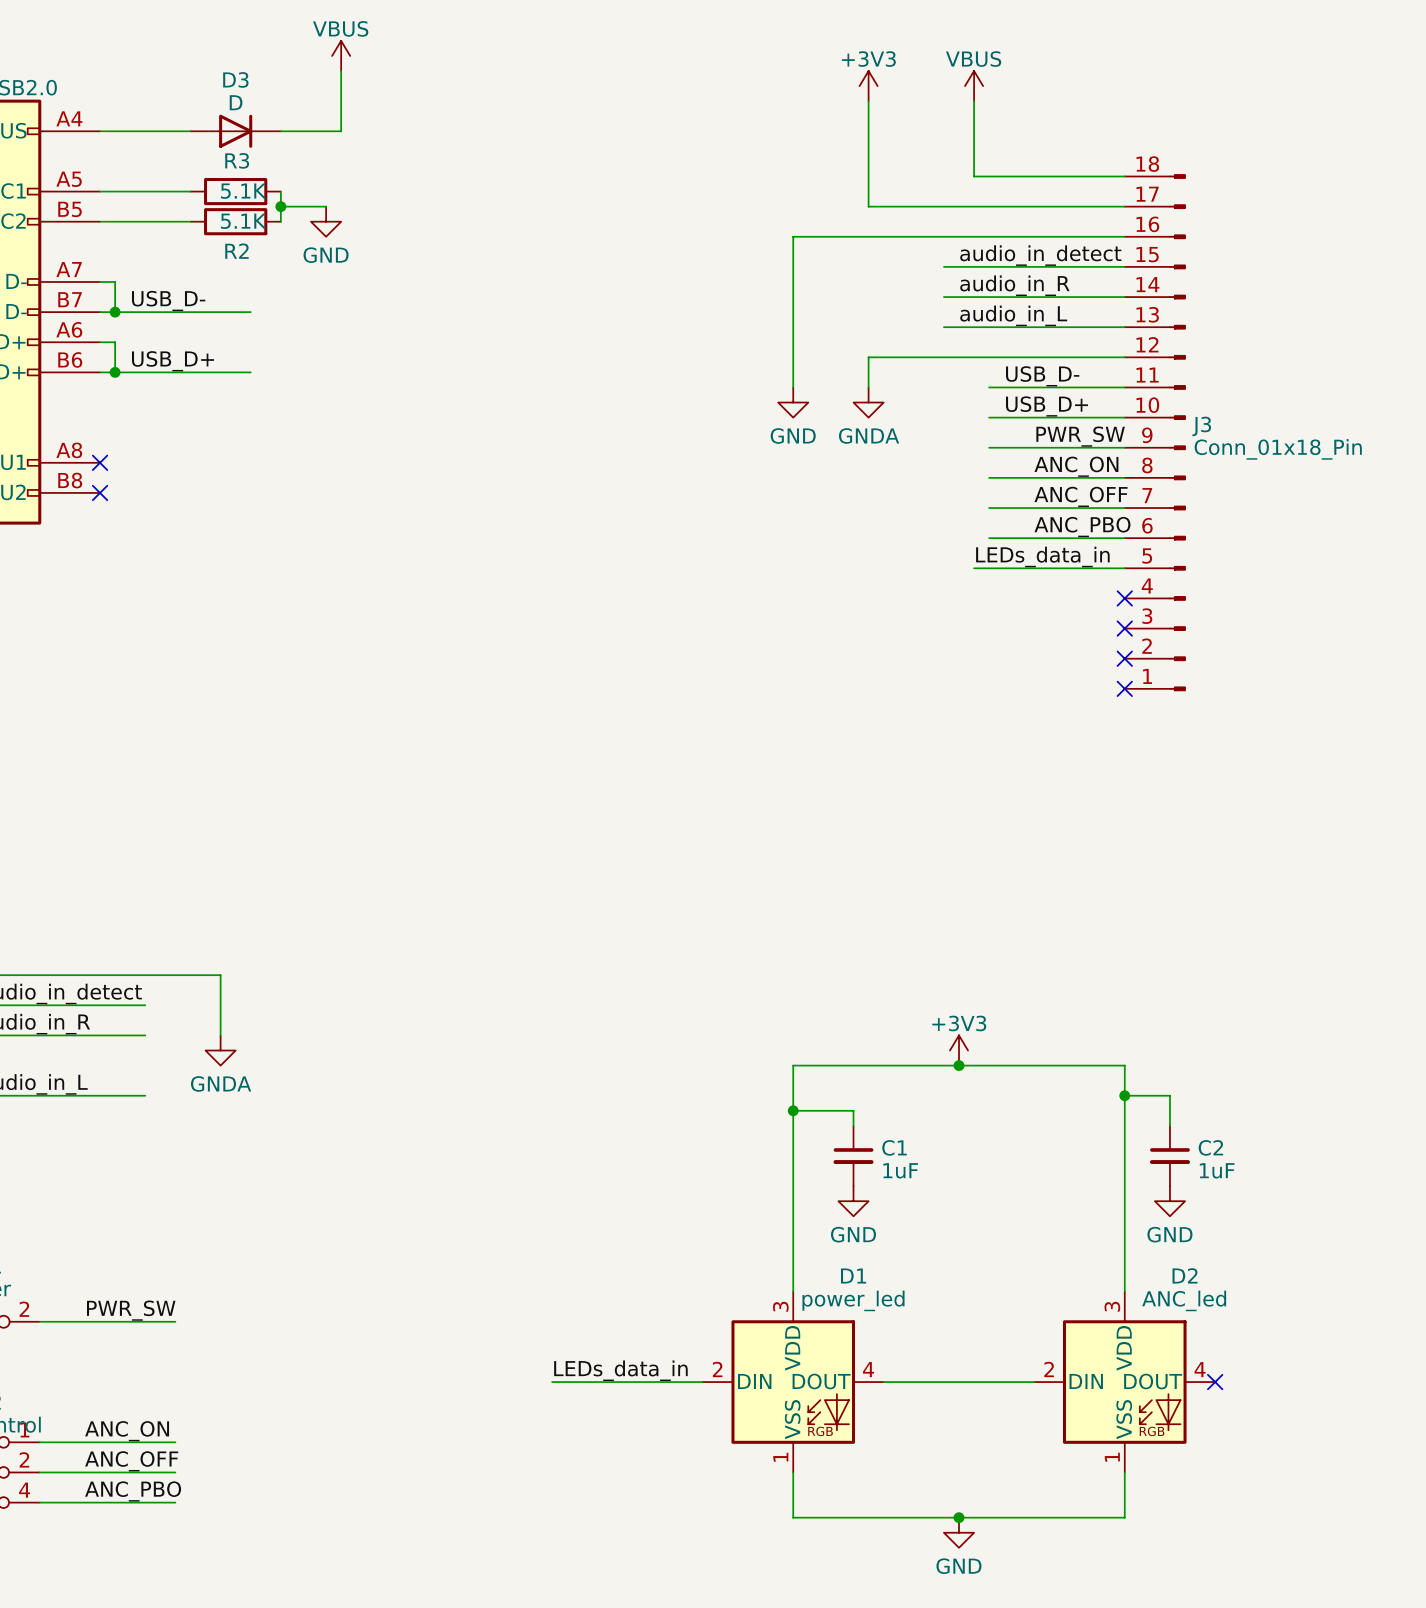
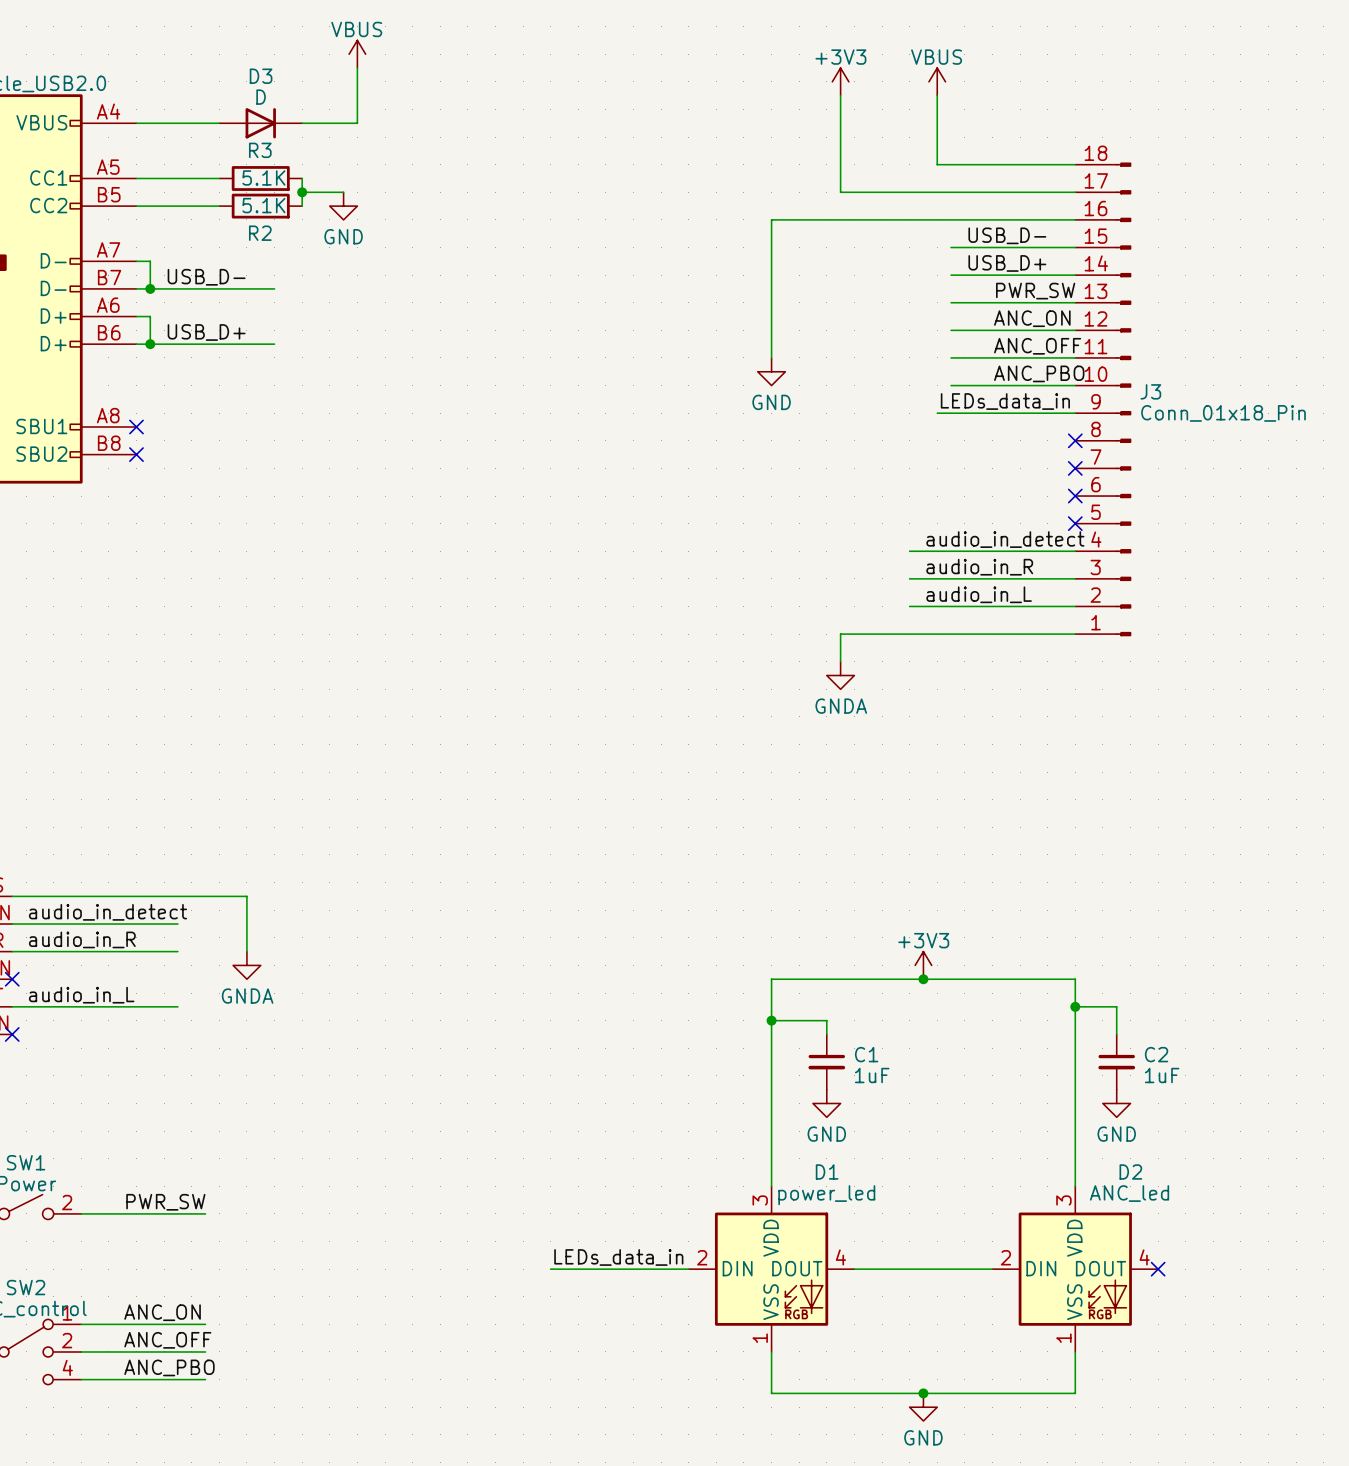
label: audio_in_detect (1040, 255) -> none
wire: (943, 266) (989, 266) -> none
label: audio_in_R (1014, 285) -> none
wire: (943, 297) (989, 297) -> none
label: audio_in_L (1013, 315) -> none
wire: (943, 327) (989, 327) -> none
wire: (989, 357) (868, 357) (868, 387) -> none
label position: USB_D- (1042, 376) -> USB_D- (1007, 235)
power symbol: GNDA (868, 402) -> none
label position: USB_D+ (1047, 406) -> USB_D+ (1007, 263)
label position: PWR_SW (1080, 436) -> PWR_SW (1035, 291)
wire: none -> (937, 413) (951, 413)
label position: ANC_ON (1076, 466) -> ANC_ON (1032, 318)
wire: (989, 477) (1124, 477) -> none
no-connect mark: none -> (1075, 440)
label position: ANC_OFF (1081, 496) -> ANC_OFF (1037, 346)
wire: (989, 508) (1124, 508) -> none
no-connect mark: none -> (1075, 468)
label position: ANC_PBO (1082, 527) -> ANC_PBO (1039, 373)
wire: (989, 538) (1124, 538) -> none
no-connect mark: none -> (1075, 496)
label position: LEDs_data_in (1042, 556) -> LEDs_data_in (1005, 401)
wire: (974, 568) (1124, 568) -> none
no-connect mark: none -> (1075, 523)
label: none -> audio_in_detect (1005, 539)
wire: none -> (909, 551) (1075, 551)
no-connect mark: (1124, 598) -> none
label: none -> audio_in_R (979, 567)
wire: none -> (909, 578) (1075, 578)
no-connect mark: (1124, 628) -> none
label: none -> audio_in_L (979, 594)
wire: none -> (909, 606) (1075, 606)
no-connect mark: (1124, 658) -> none
wire: none -> (1075, 634) (840, 634) (840, 661)
no-connect mark: (1124, 688) -> none
power symbol: none -> GNDA (840, 675)

